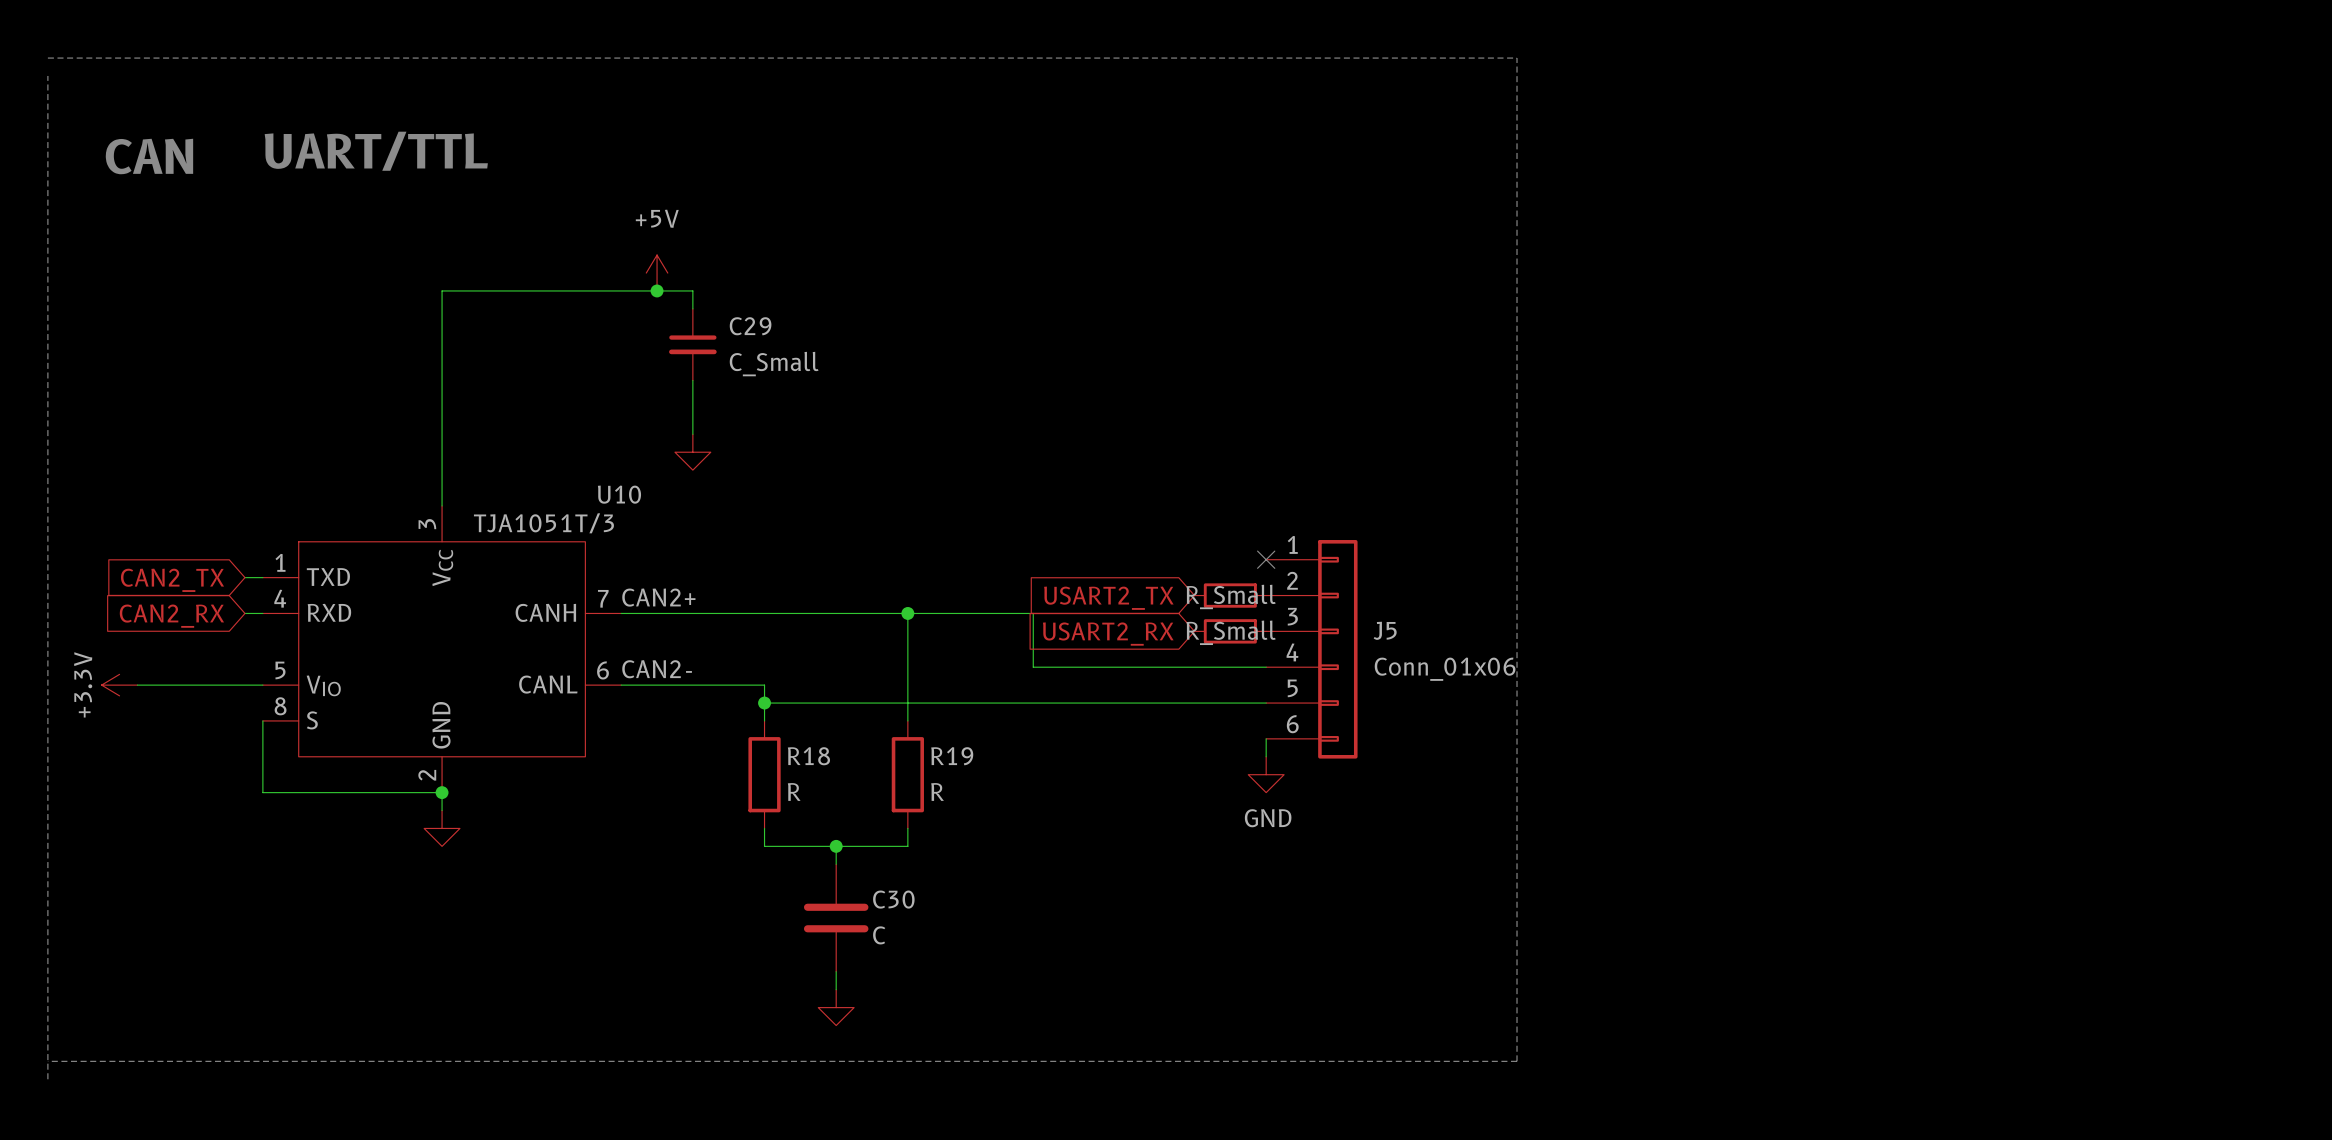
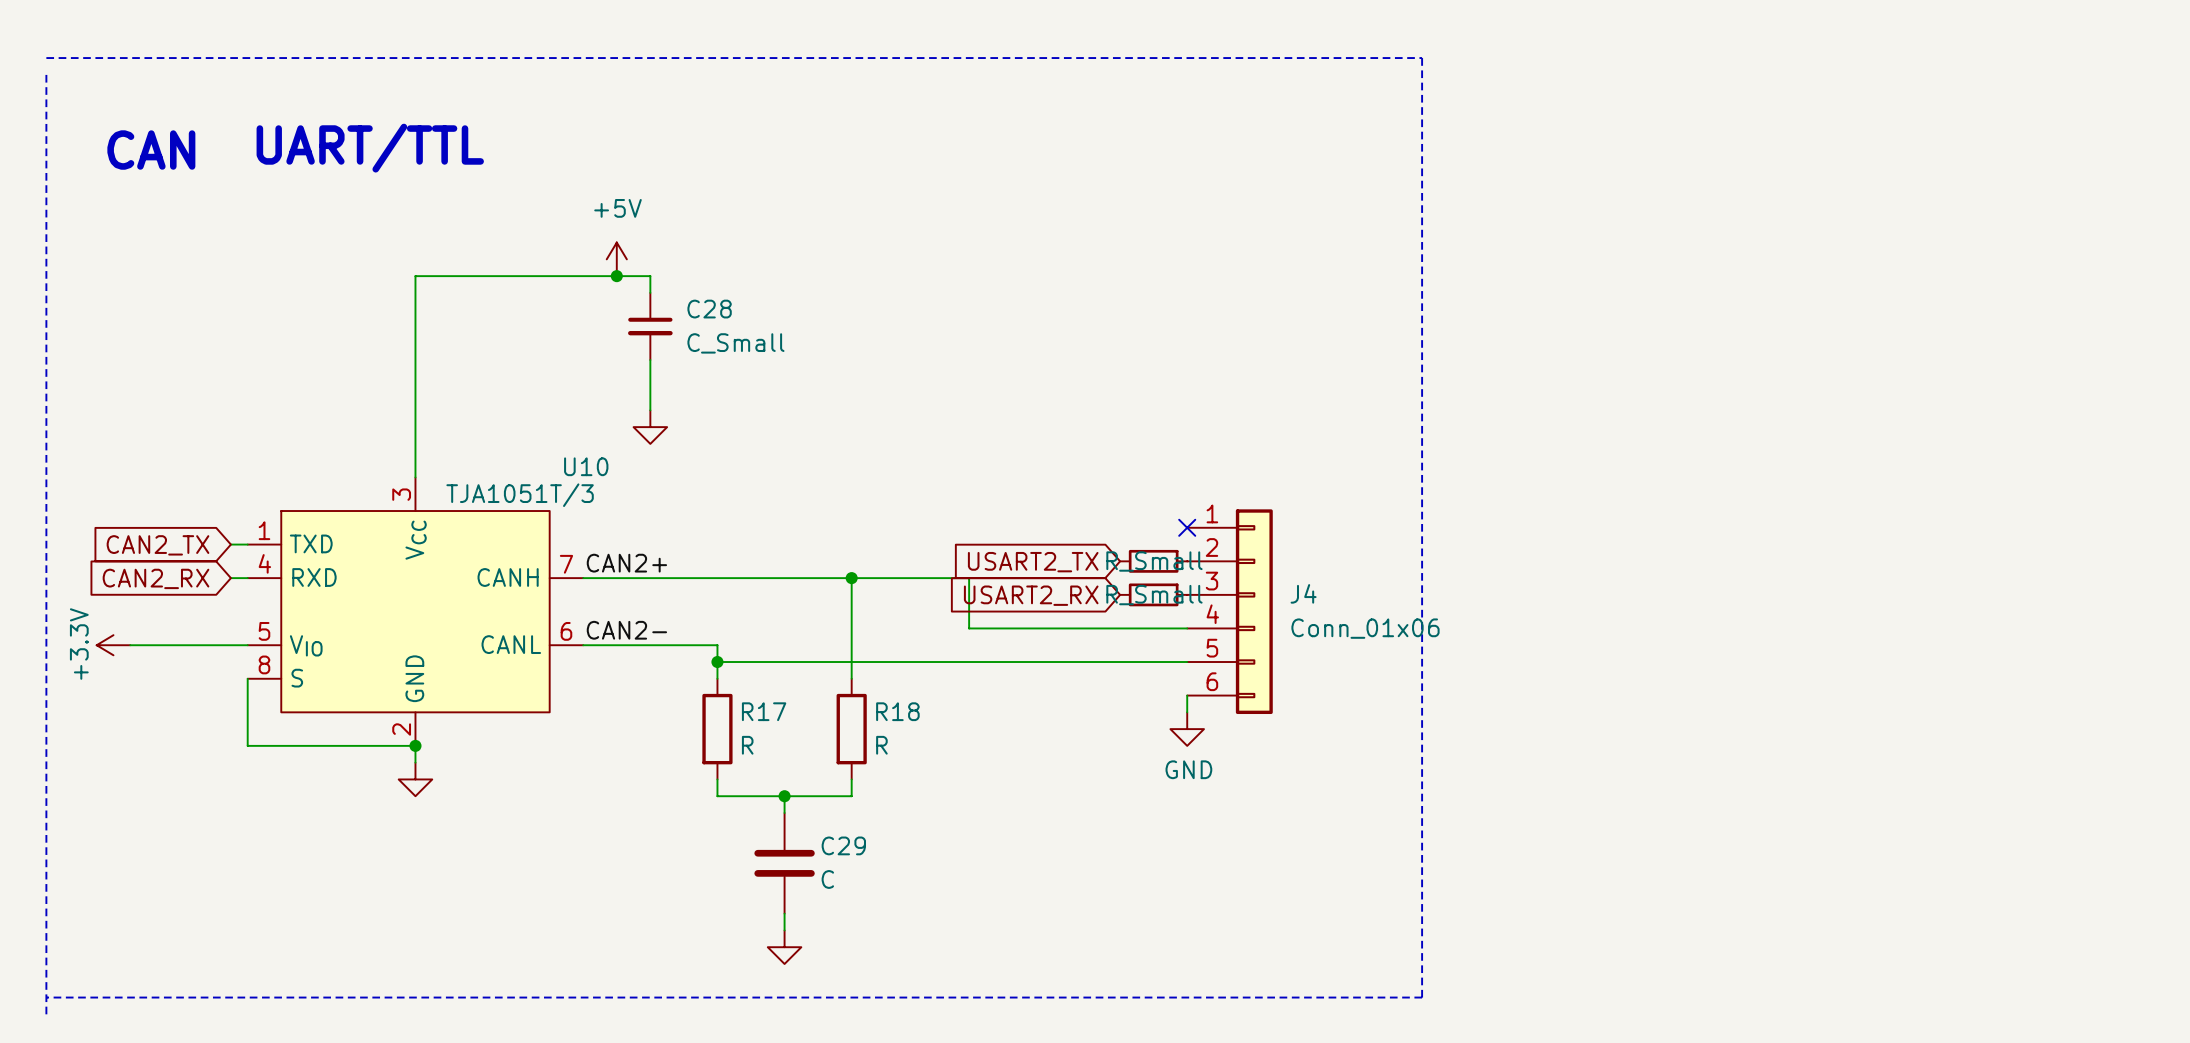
C29 name: C29 (750, 326) -> C28 (709, 309)
J5 name: J5 (1385, 630) -> J4 (1303, 593)
R18 name: R18 (808, 756) -> R17 (764, 711)
R19 name: R19 (952, 756) -> R18 (897, 711)
C30 name: C30 (893, 899) -> C29 (843, 845)

